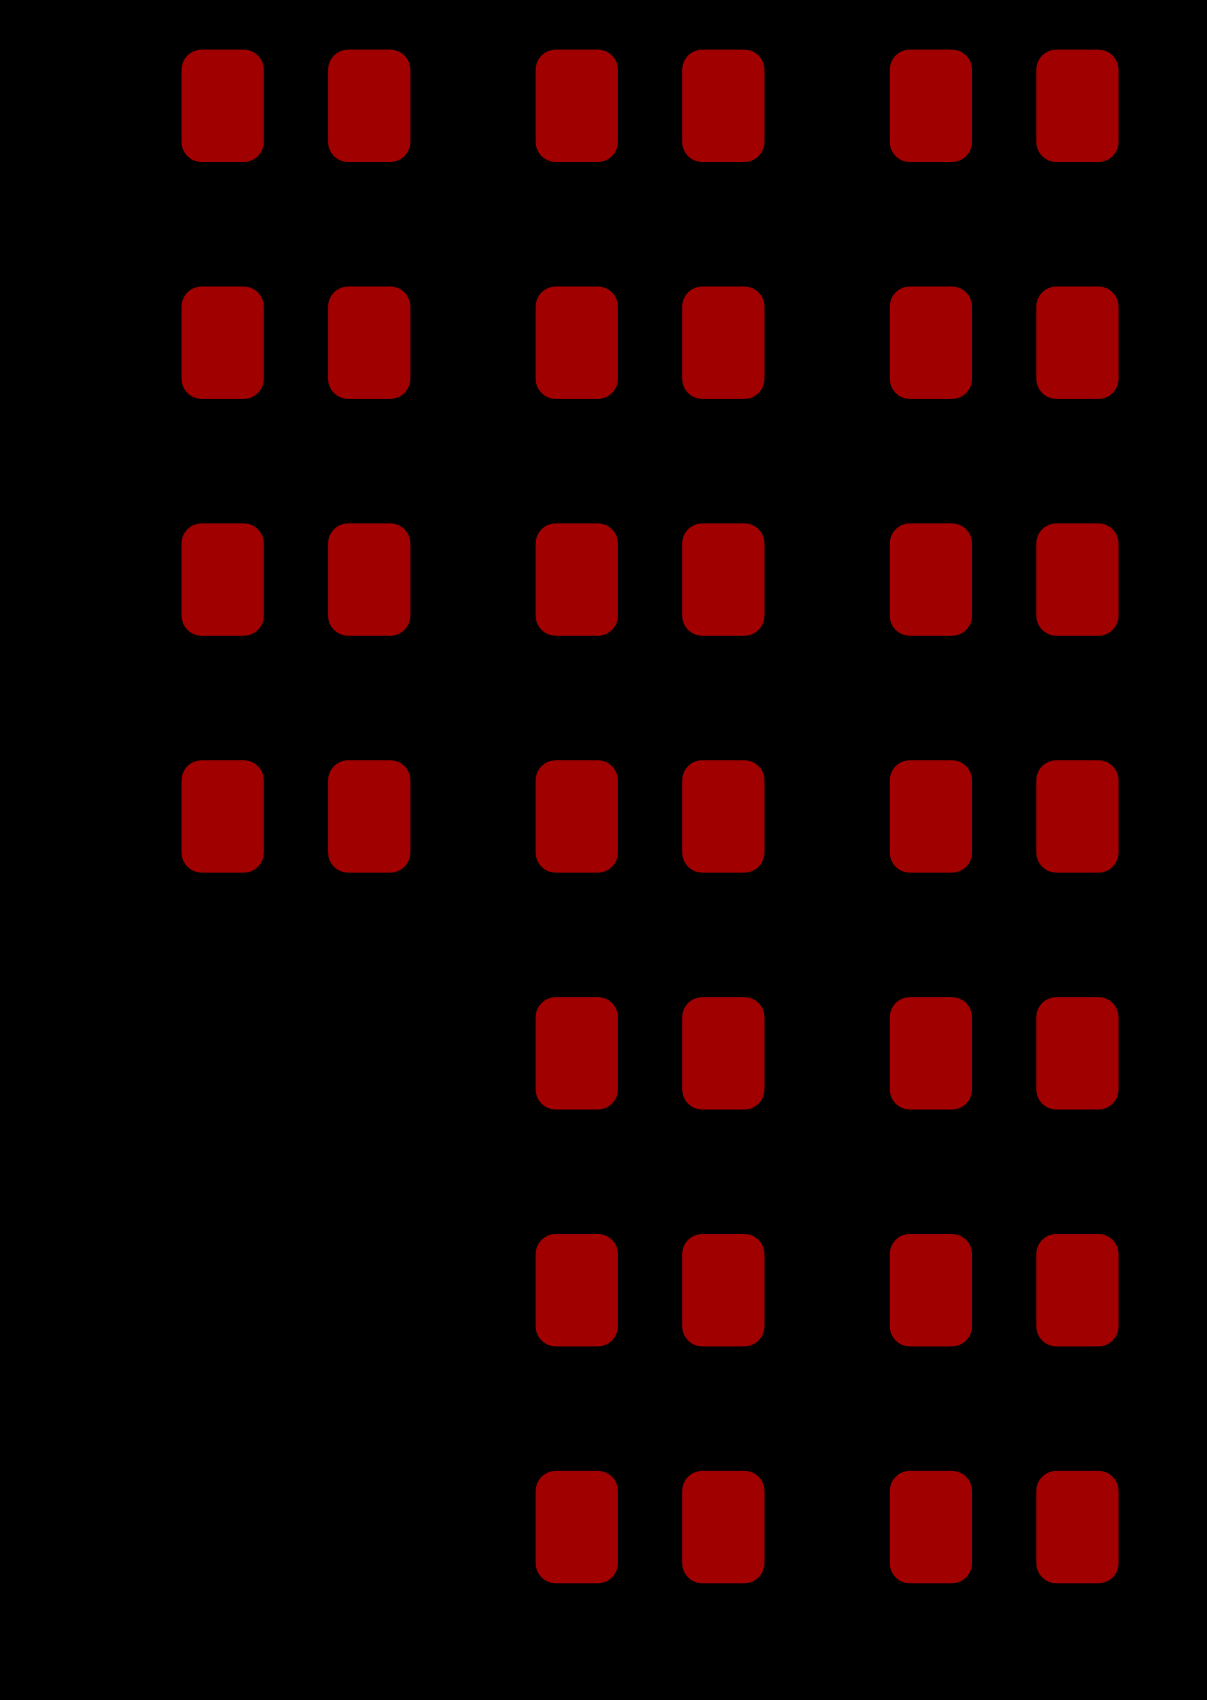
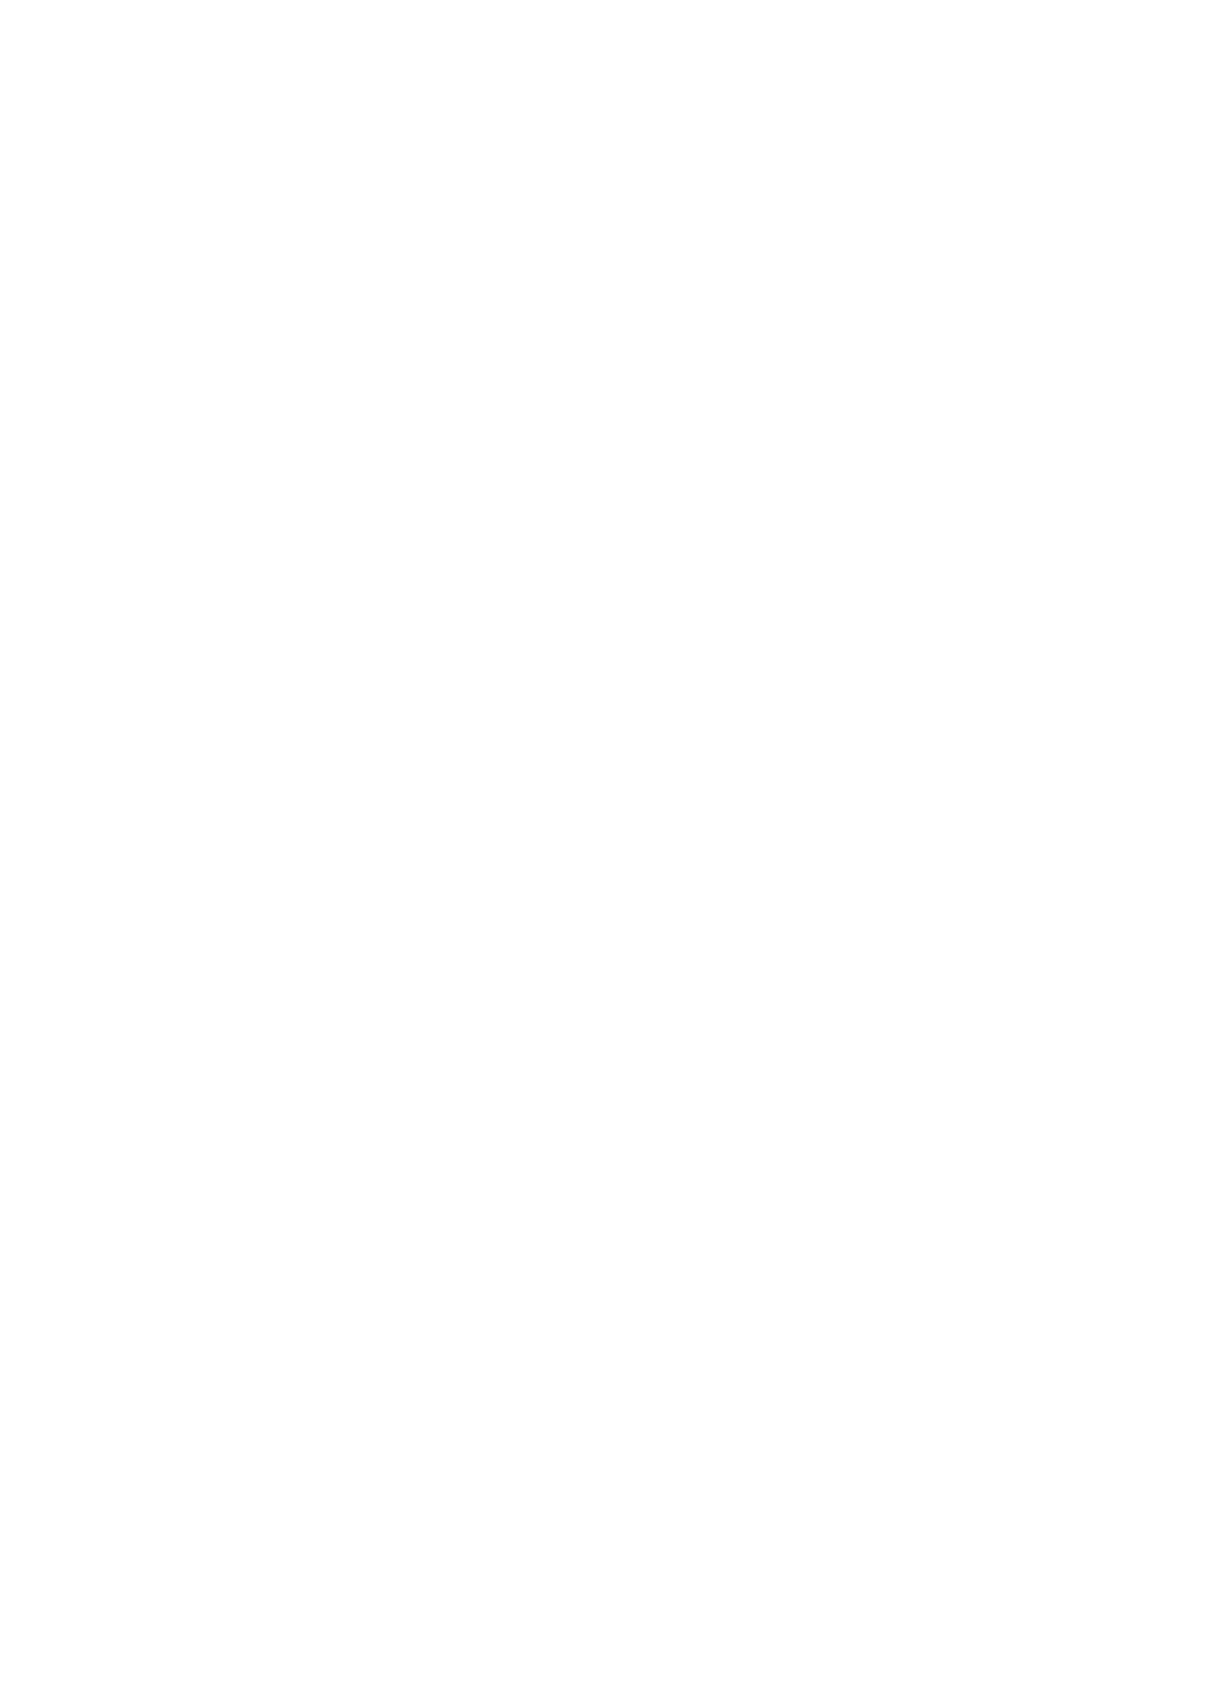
part: (295, 105) -> none
part: (650, 105) -> none
part: (1004, 105) -> none
part: (295, 342) -> none
part: (650, 342) -> none
part: (1004, 342) -> none
part: (295, 579) -> none
part: (650, 579) -> none
part: (1004, 579) -> none
part: (295, 816) -> none
part: (650, 816) -> none
part: (1004, 816) -> none
part: (650, 1053) -> none
part: (1004, 1053) -> none
part: (650, 1290) -> none
part: (1004, 1290) -> none
part: (650, 1527) -> none
part: (1004, 1527) -> none

